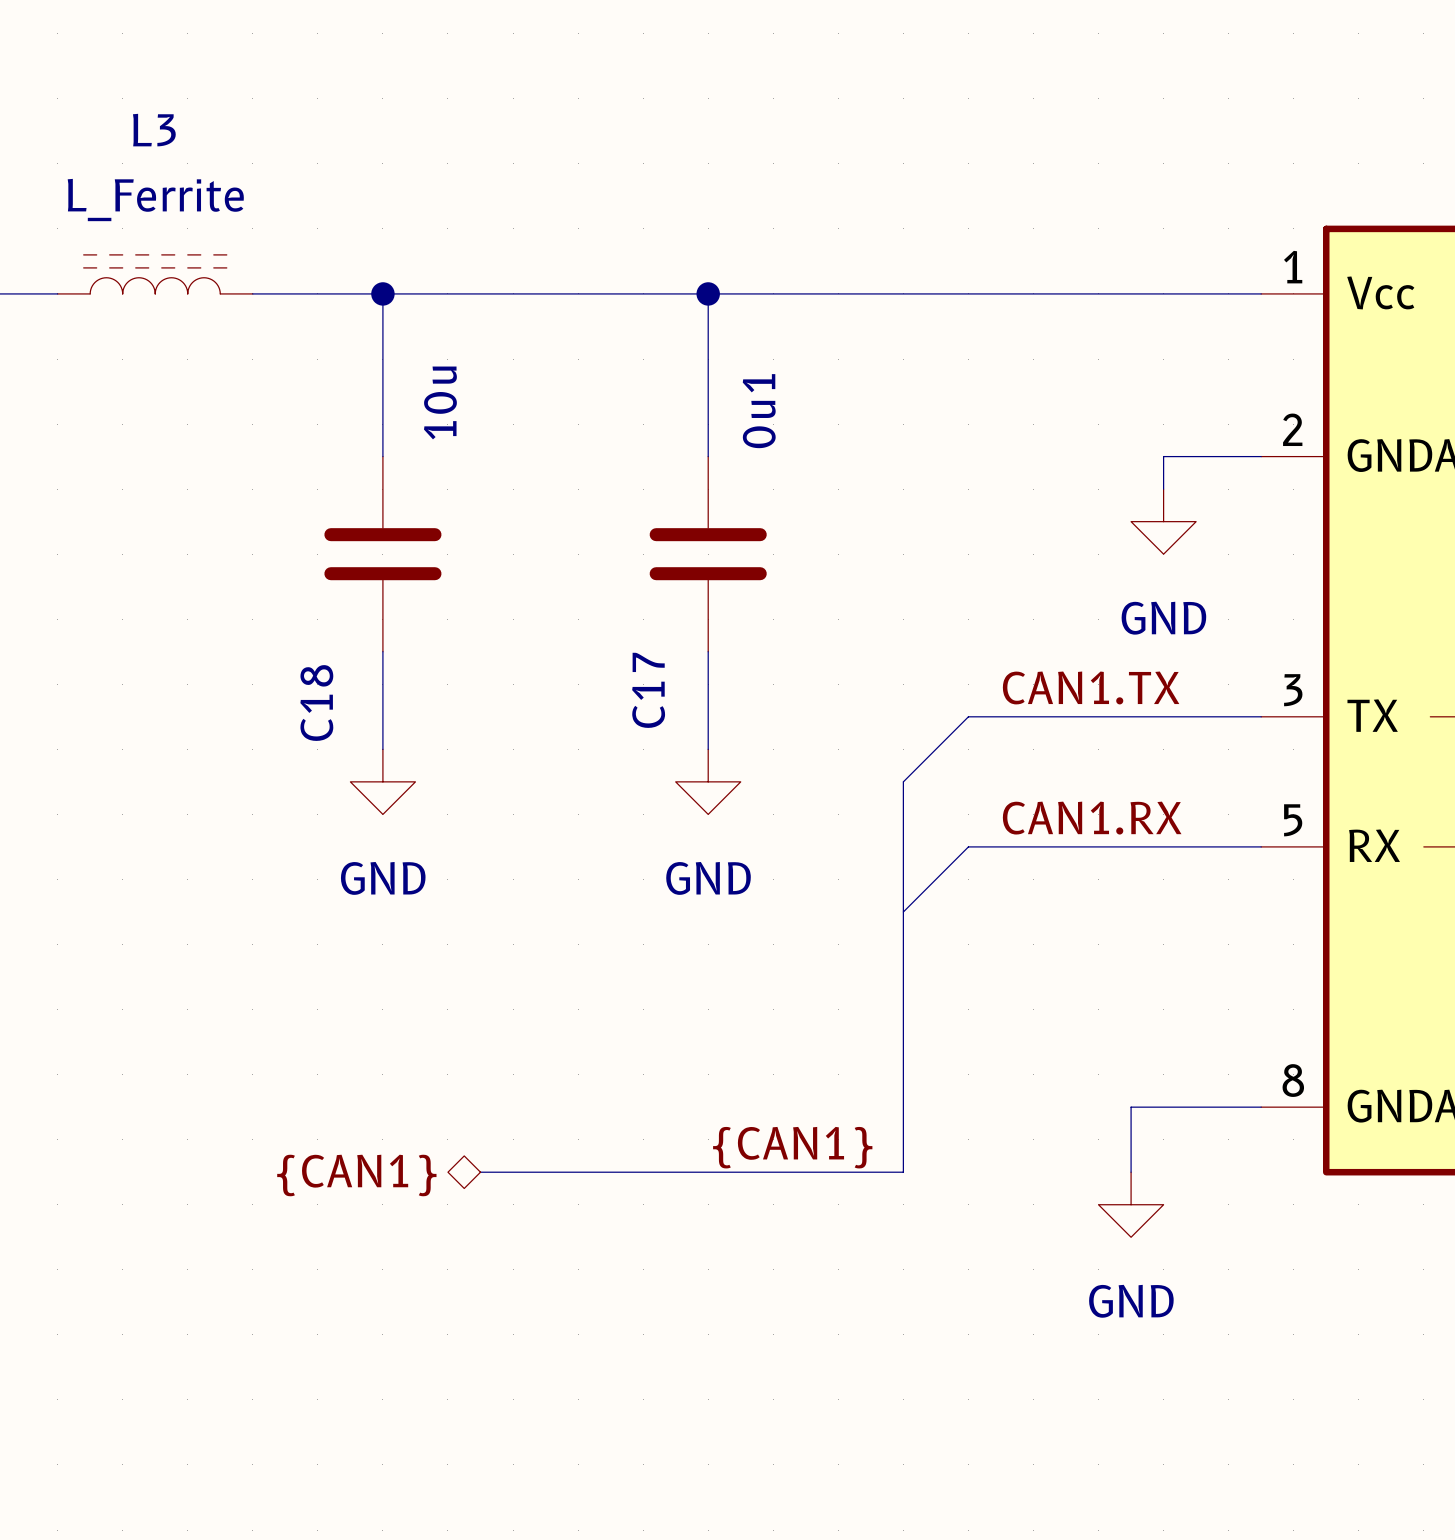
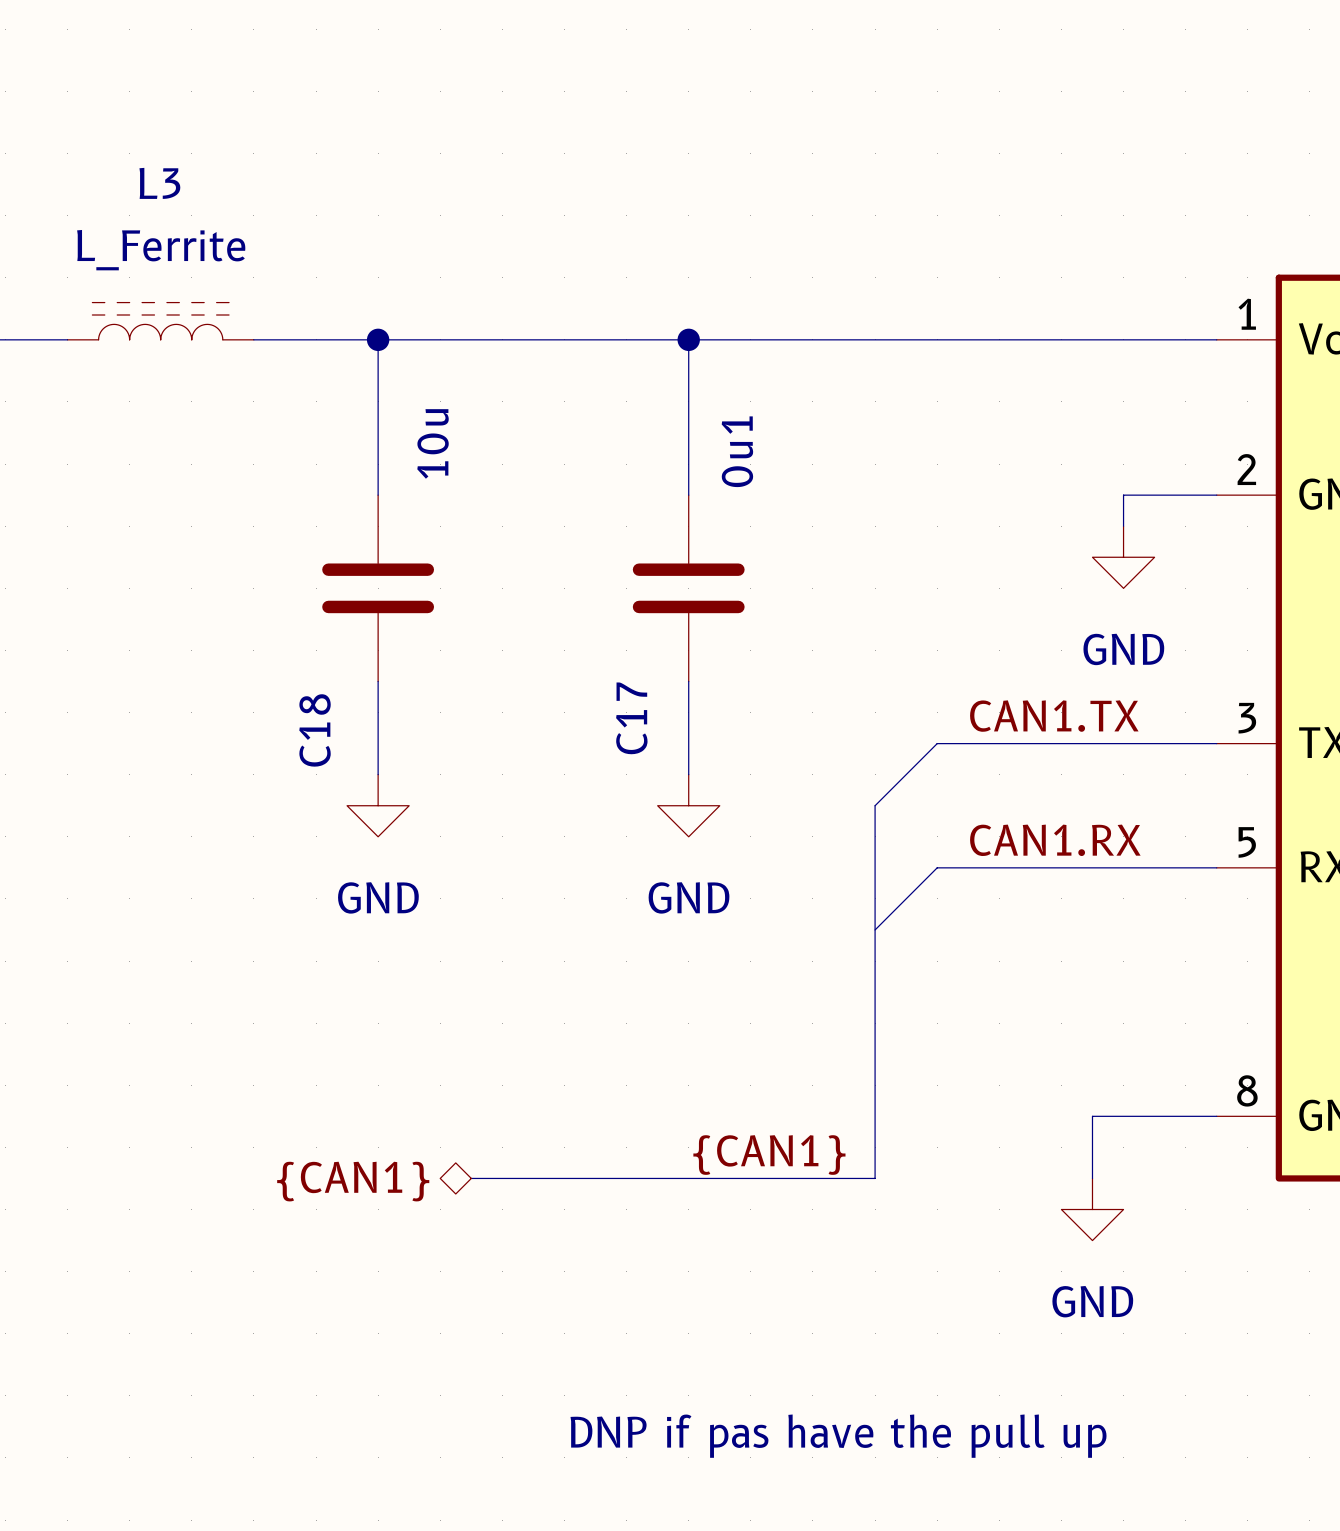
text: none -> DNP if pas have the pull up (838, 1436)

